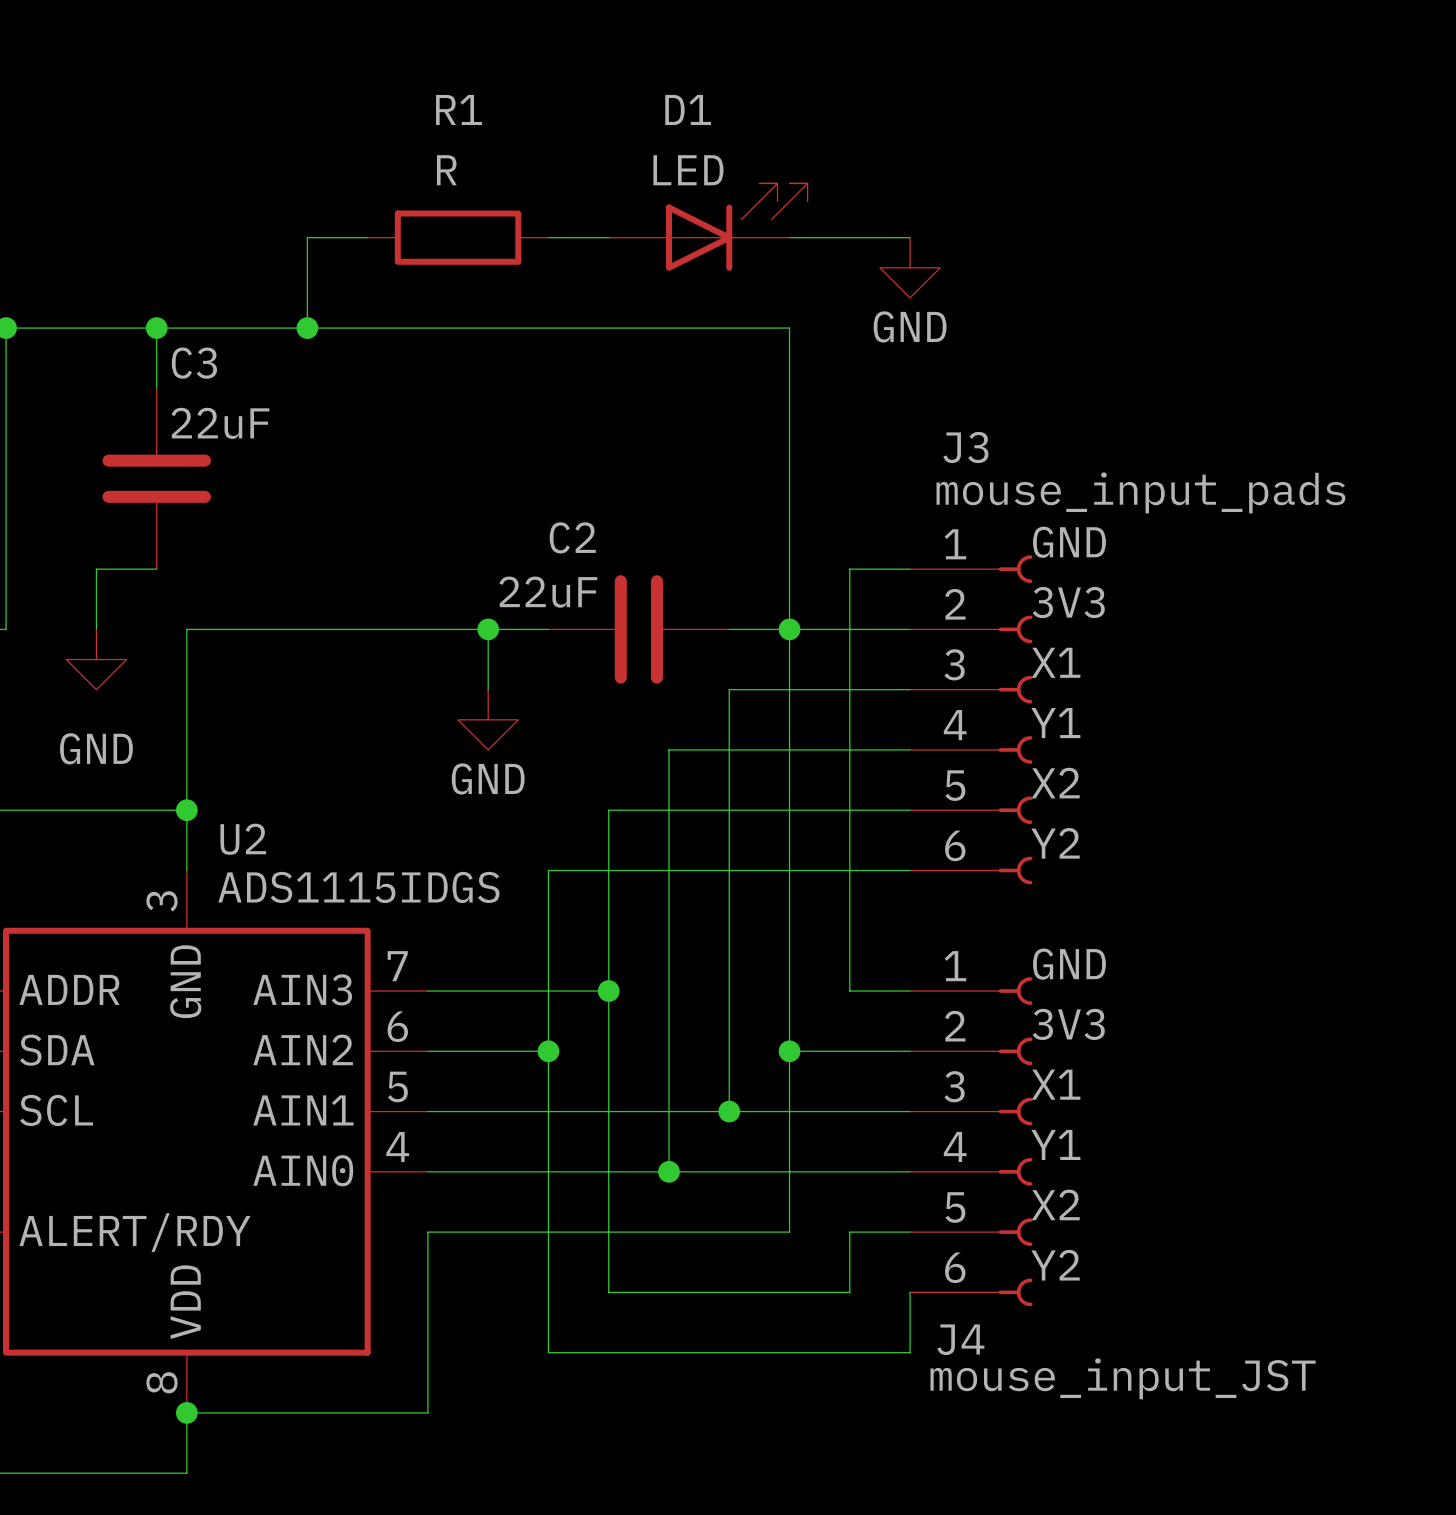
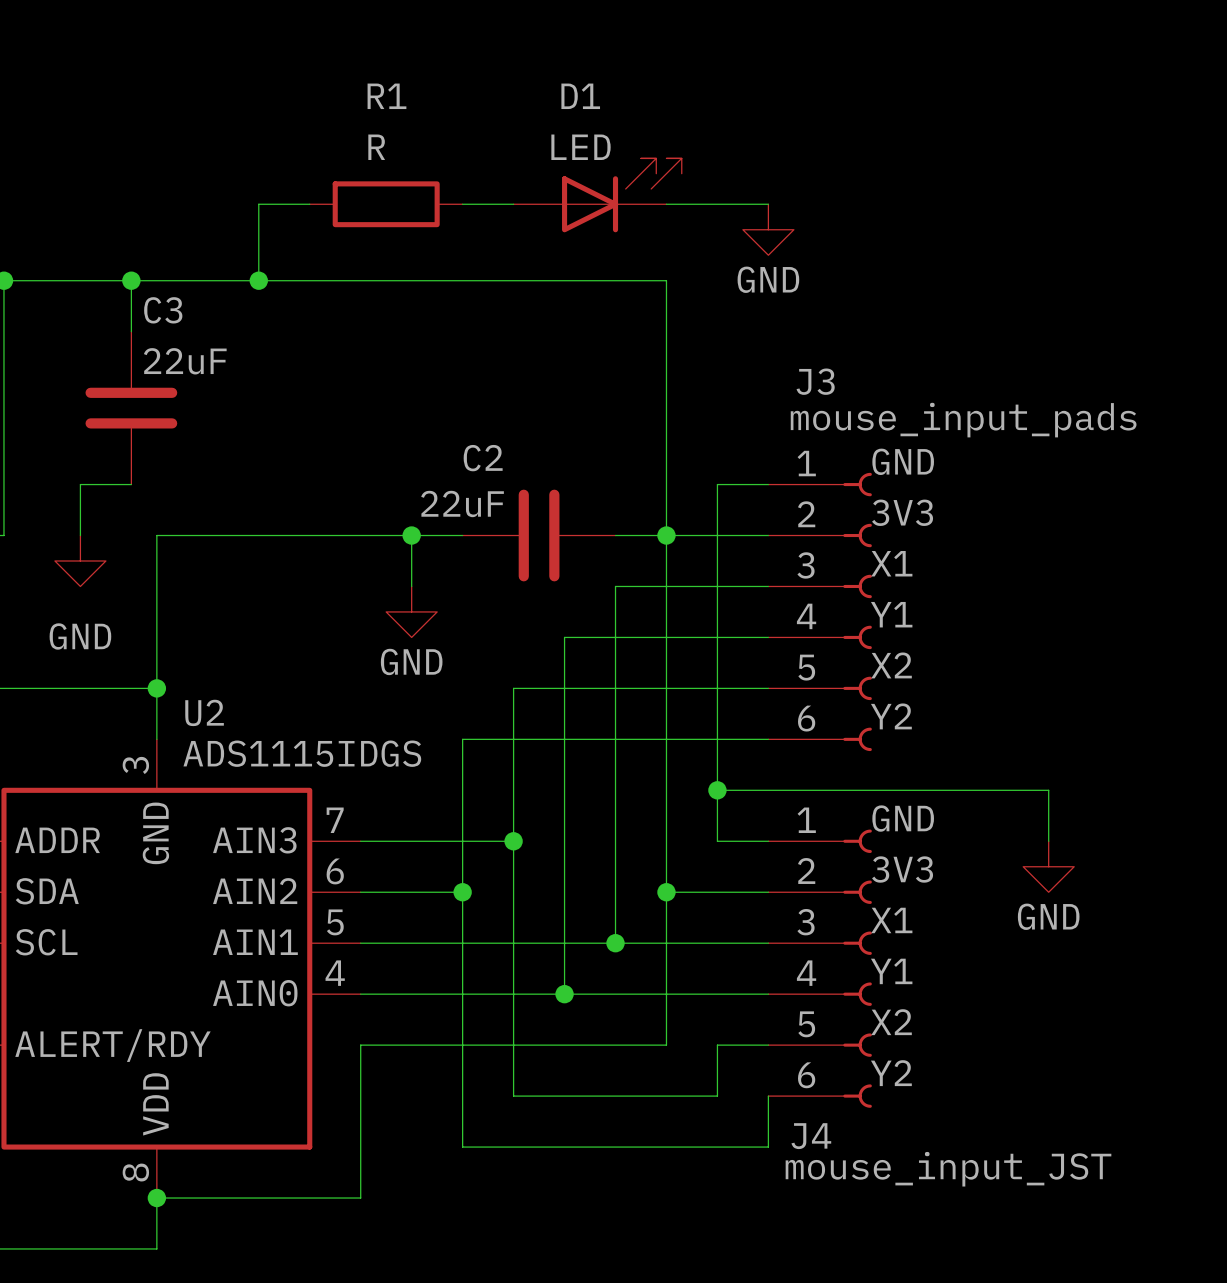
wire: none -> (717, 790) (1048, 790) (1048, 841)
junction: none -> (717, 790)
power symbol: none -> GND (1048, 866)

